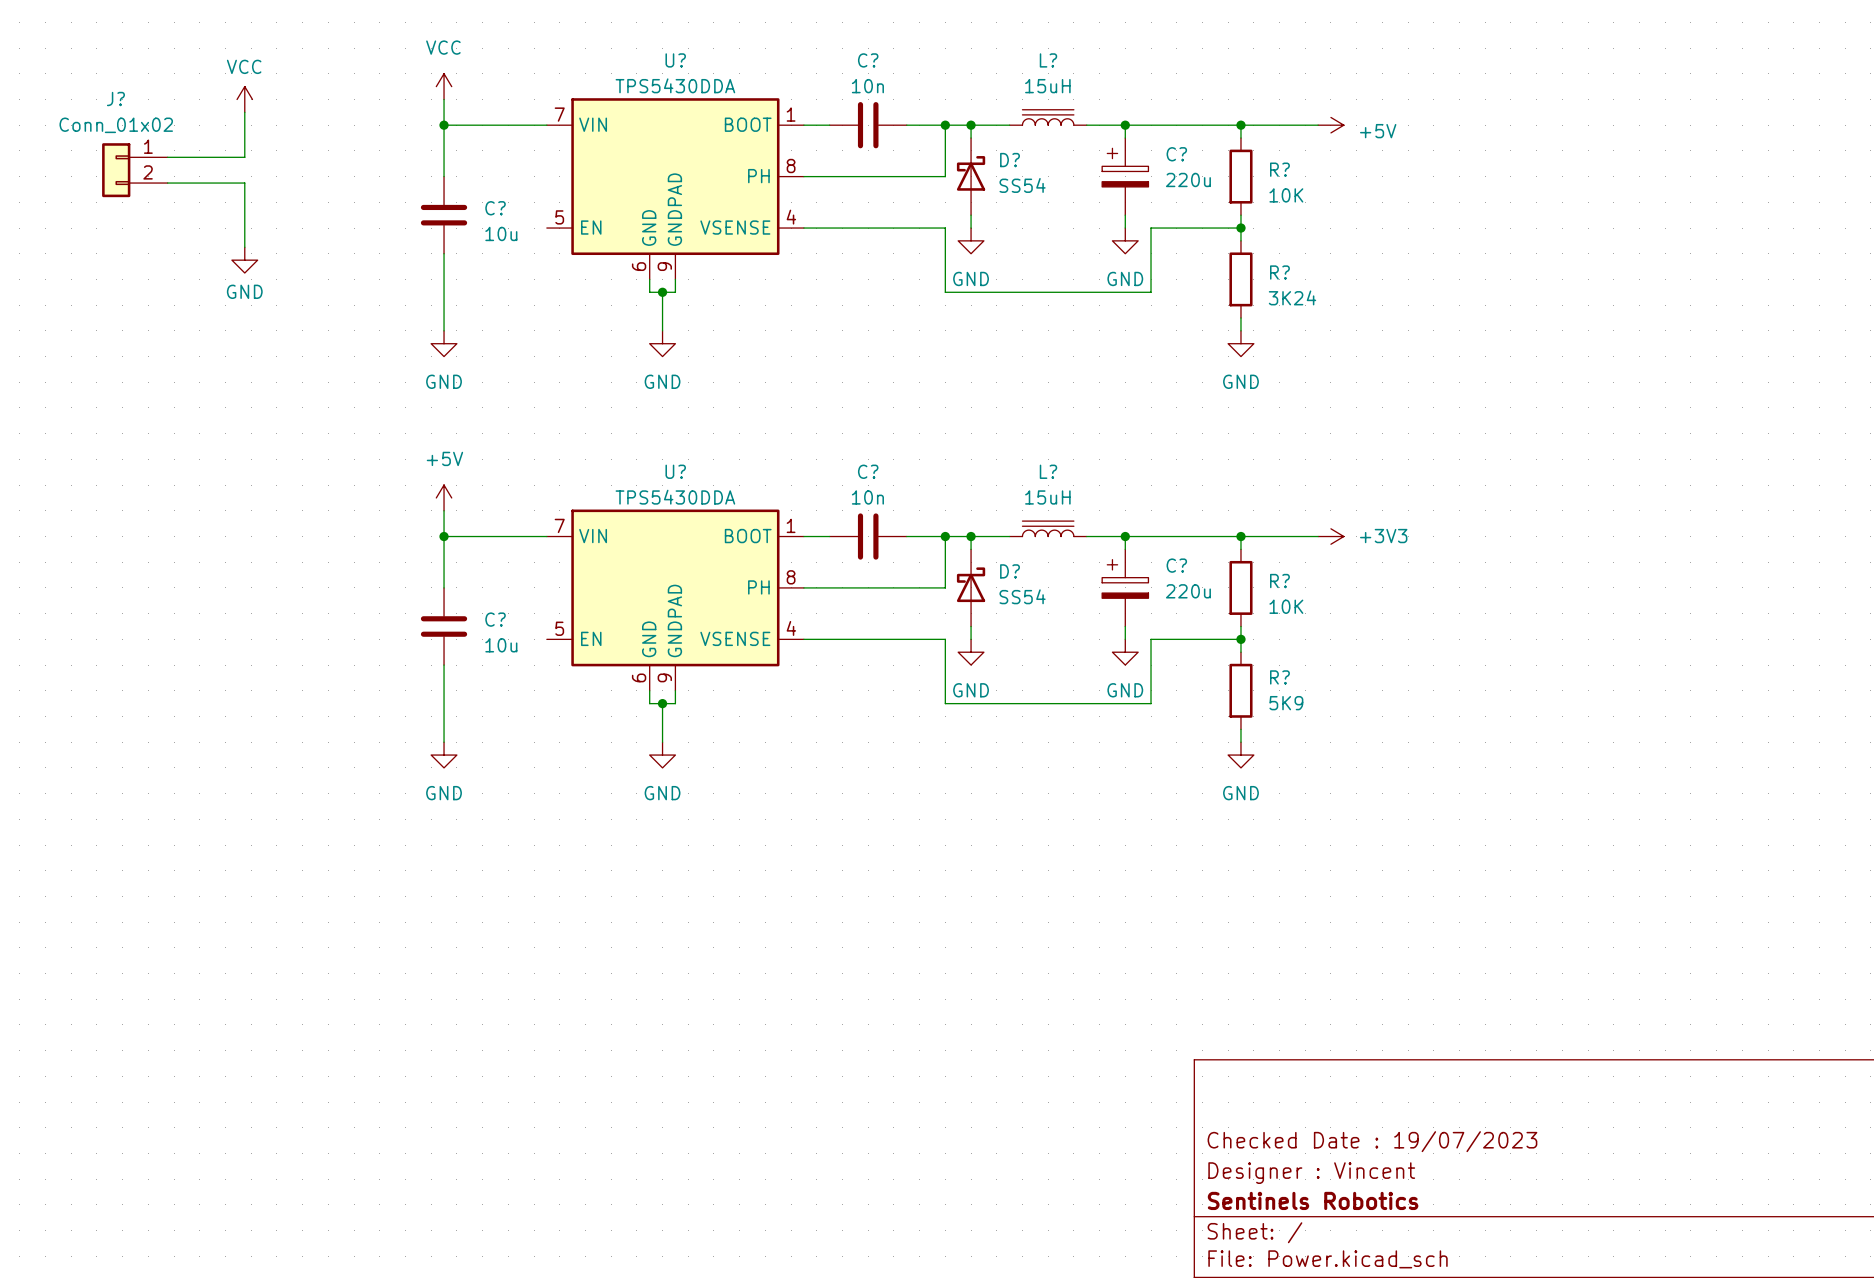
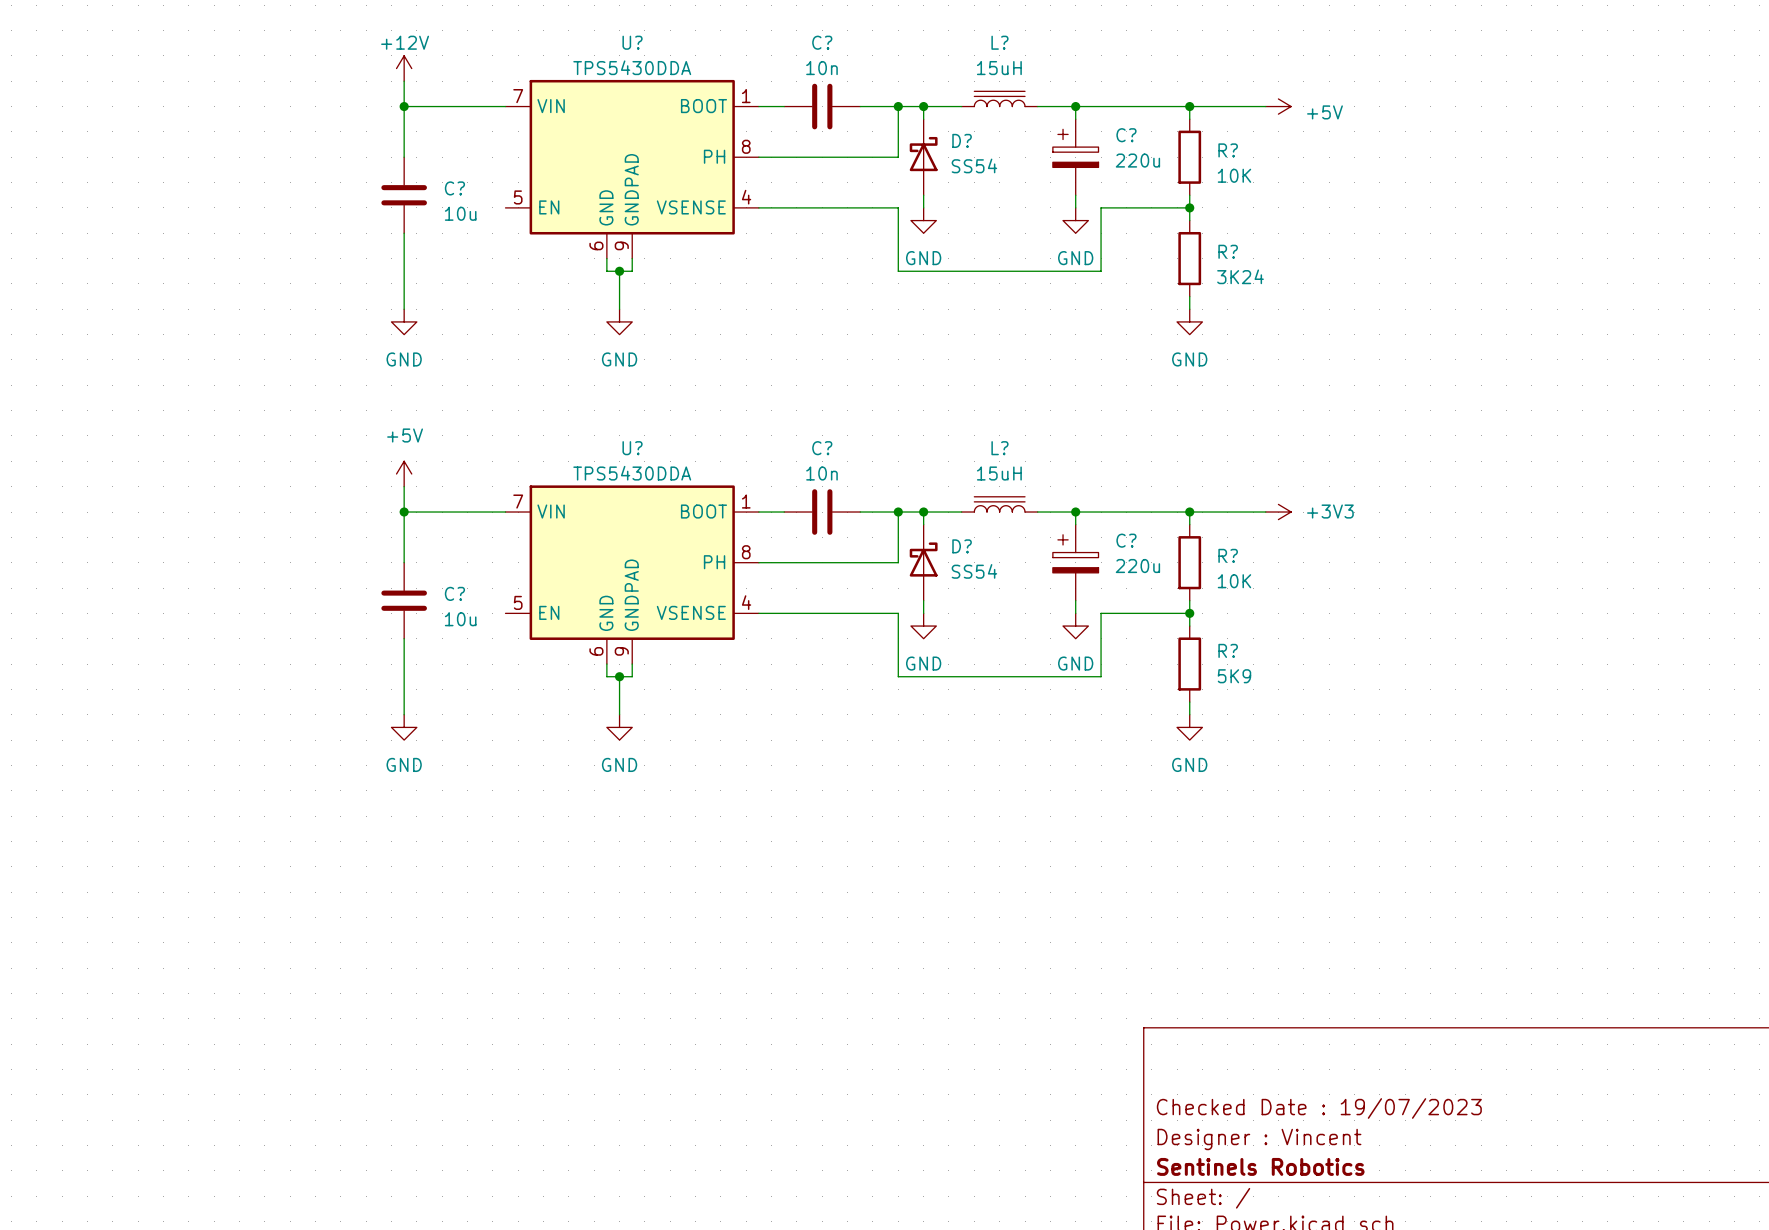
power symbol: VCC (444, 86) -> +12V (404, 68)
power symbol: VCC (244, 99) -> none
wire: (244, 112) (244, 157) (167, 157) -> none
J?: Conn_01x02 (134, 170) -> none
wire: (167, 183) (244, 183) (244, 247) -> none
power symbol: GND (244, 260) -> none

